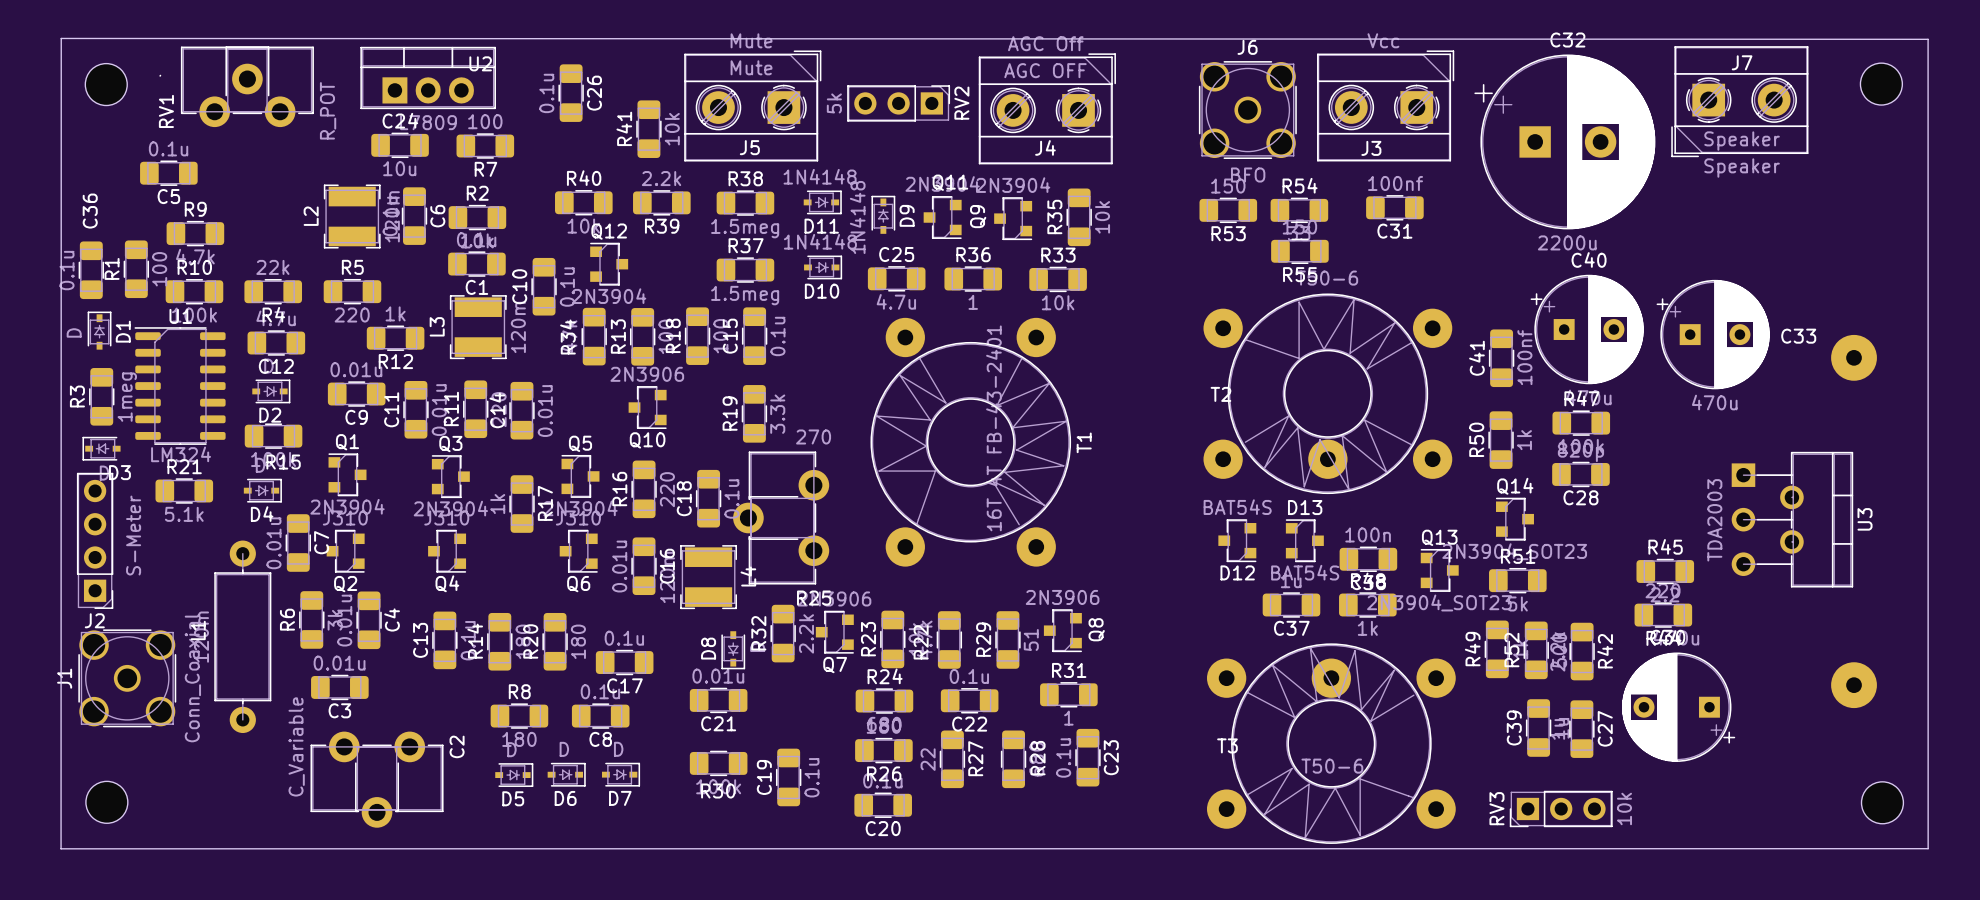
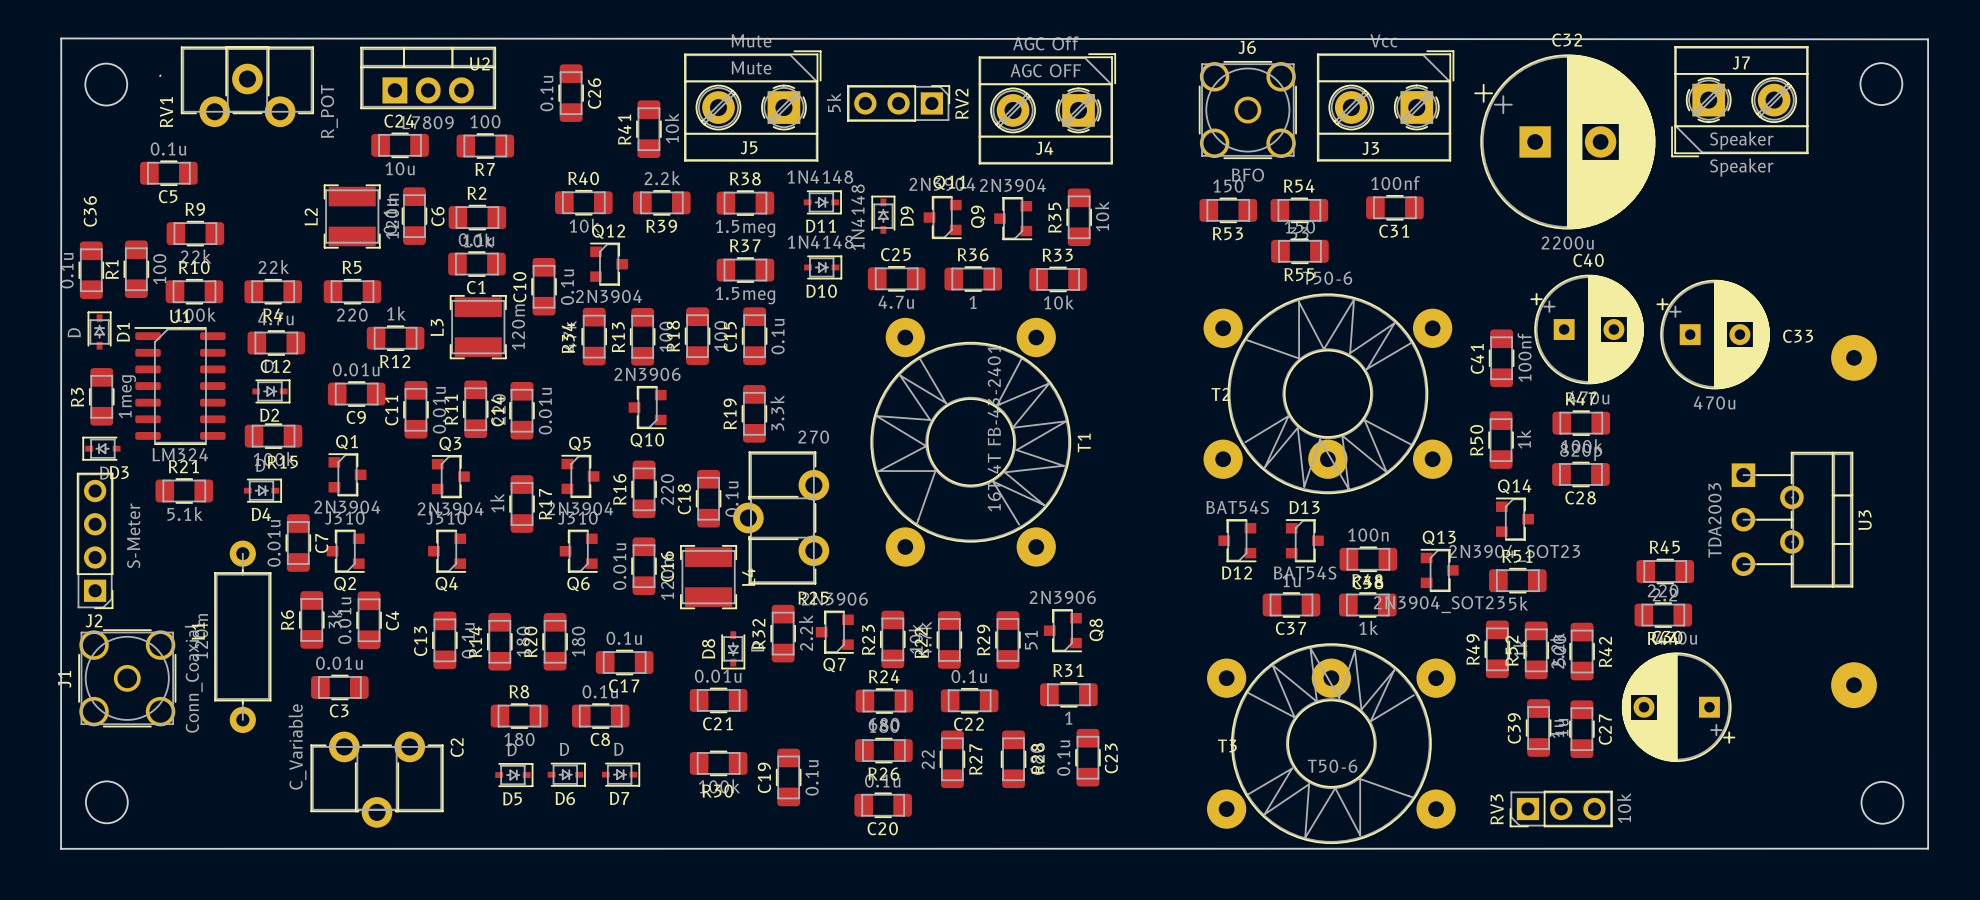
R9 value: 4.7k (195, 256) -> 22k (196, 256)

